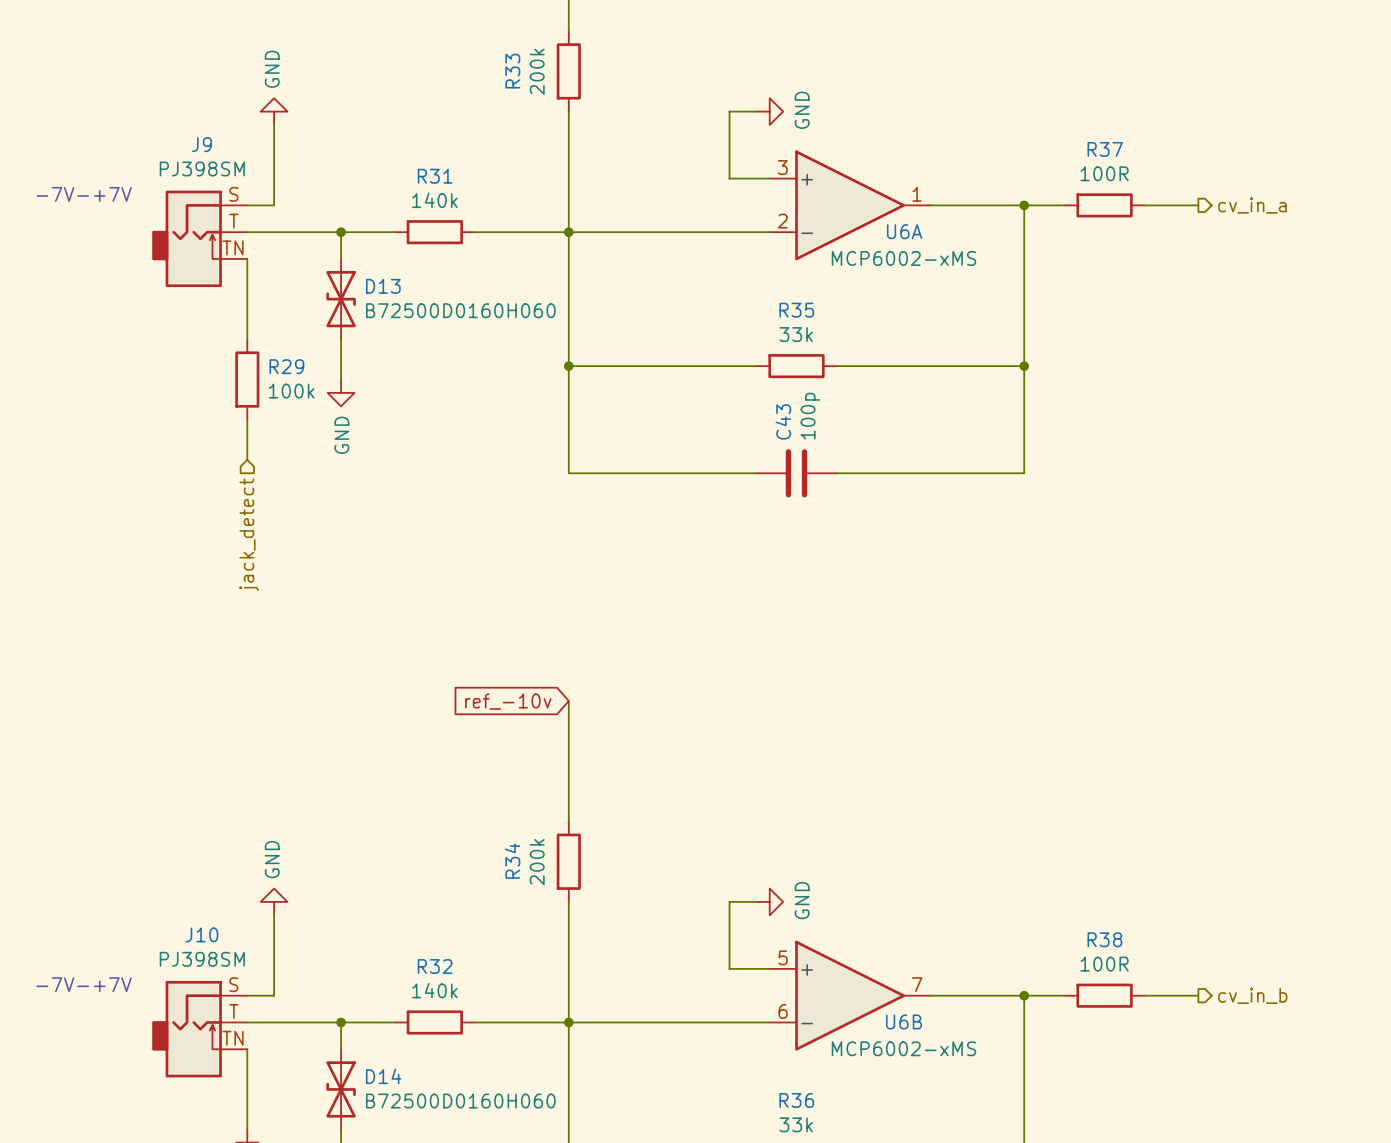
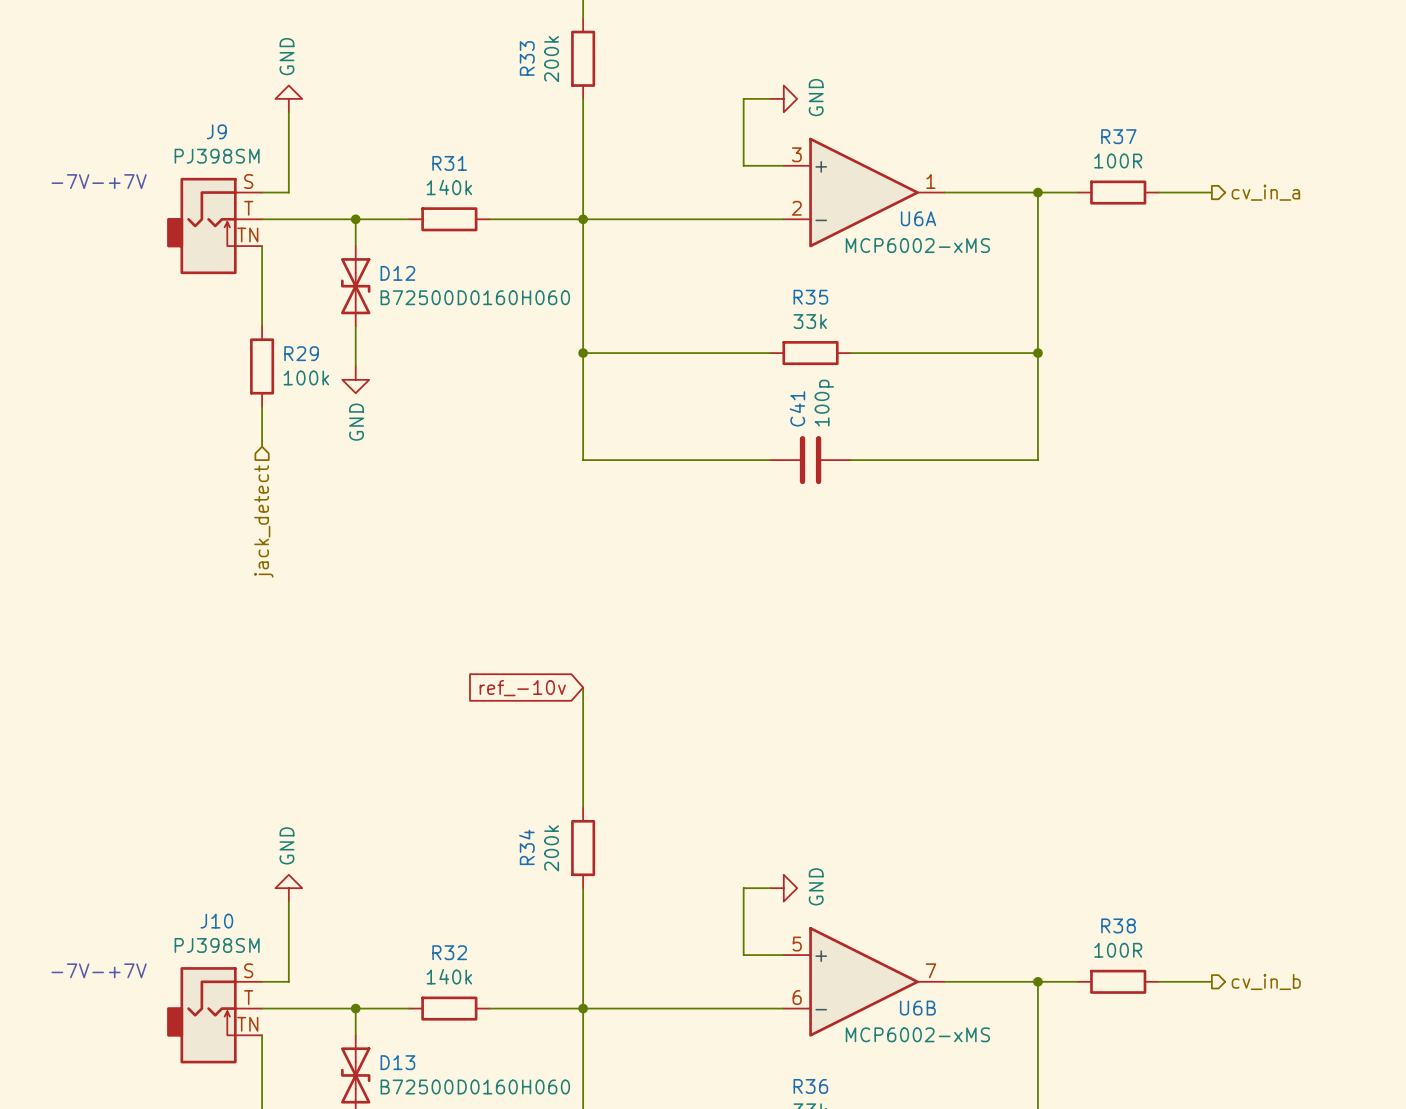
D13 name: D13 (383, 286) -> D12 (397, 273)
C43 name: C43 (783, 421) -> C41 (797, 408)
D14 name: D14 (383, 1076) -> D13 (397, 1062)

